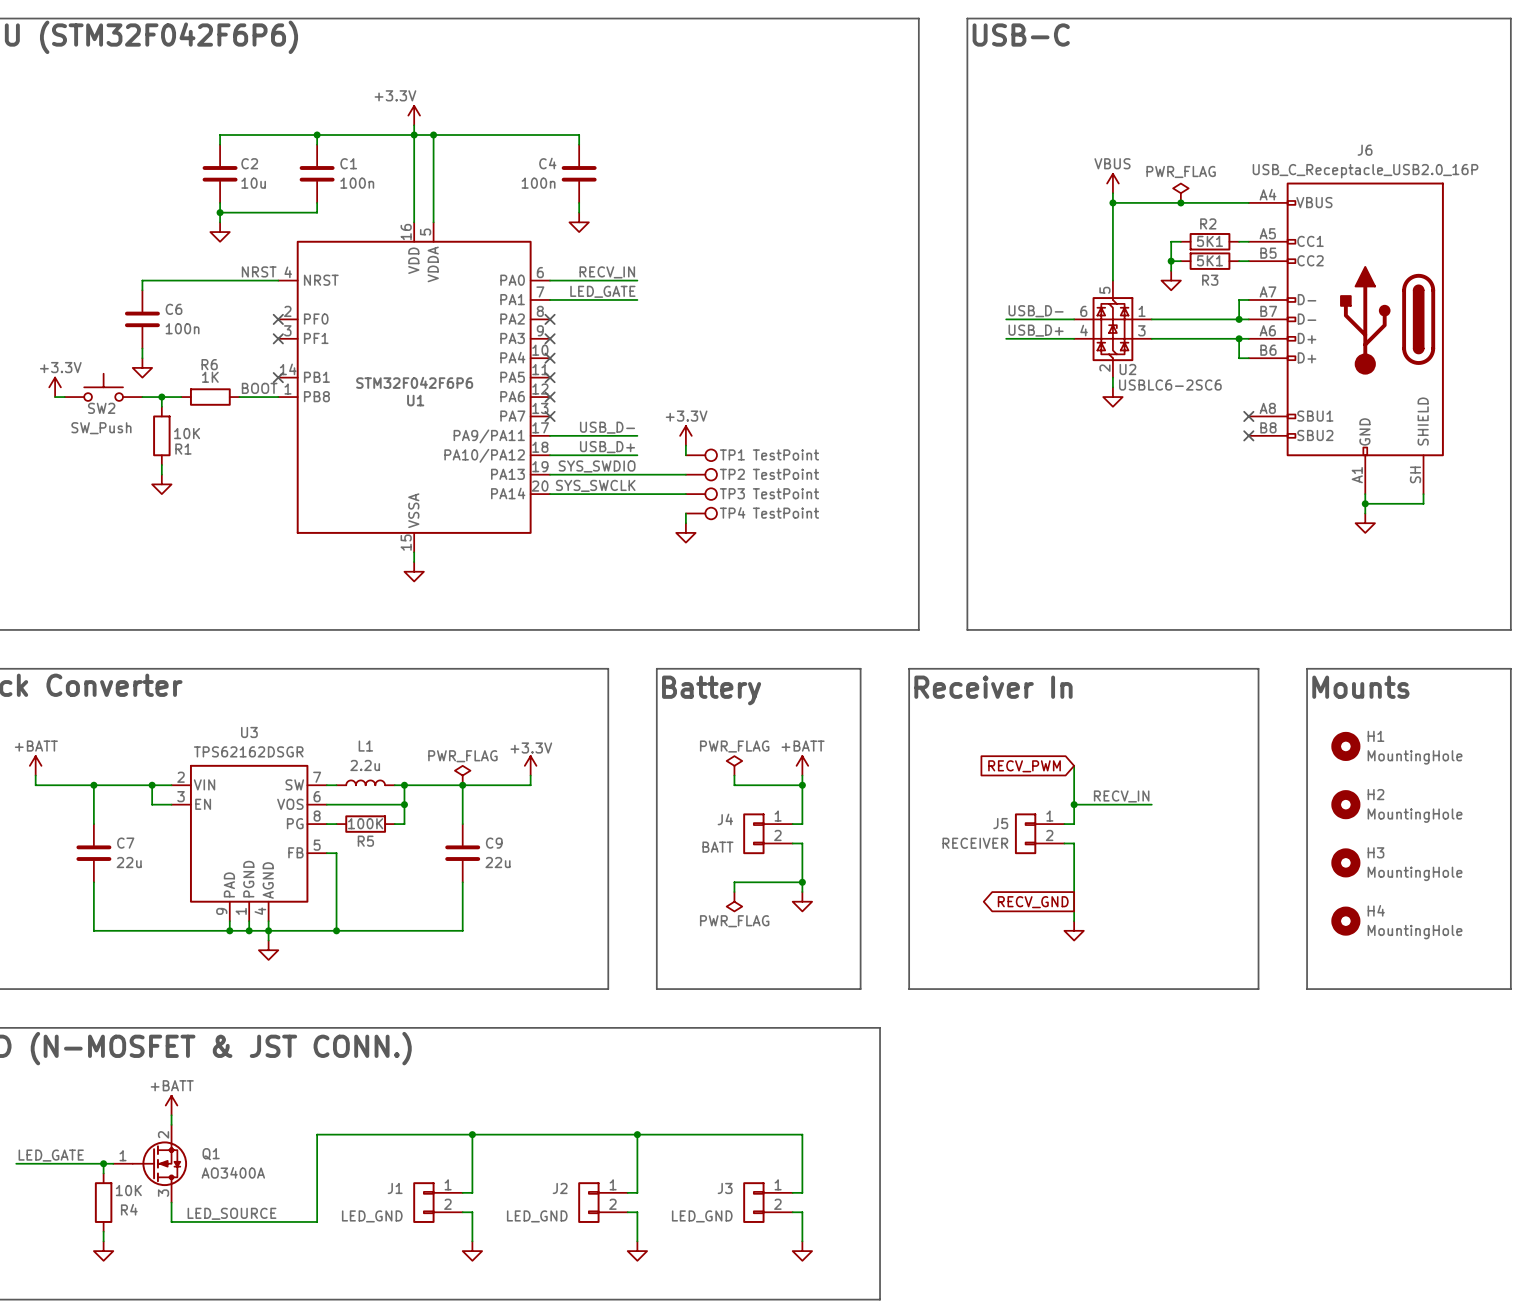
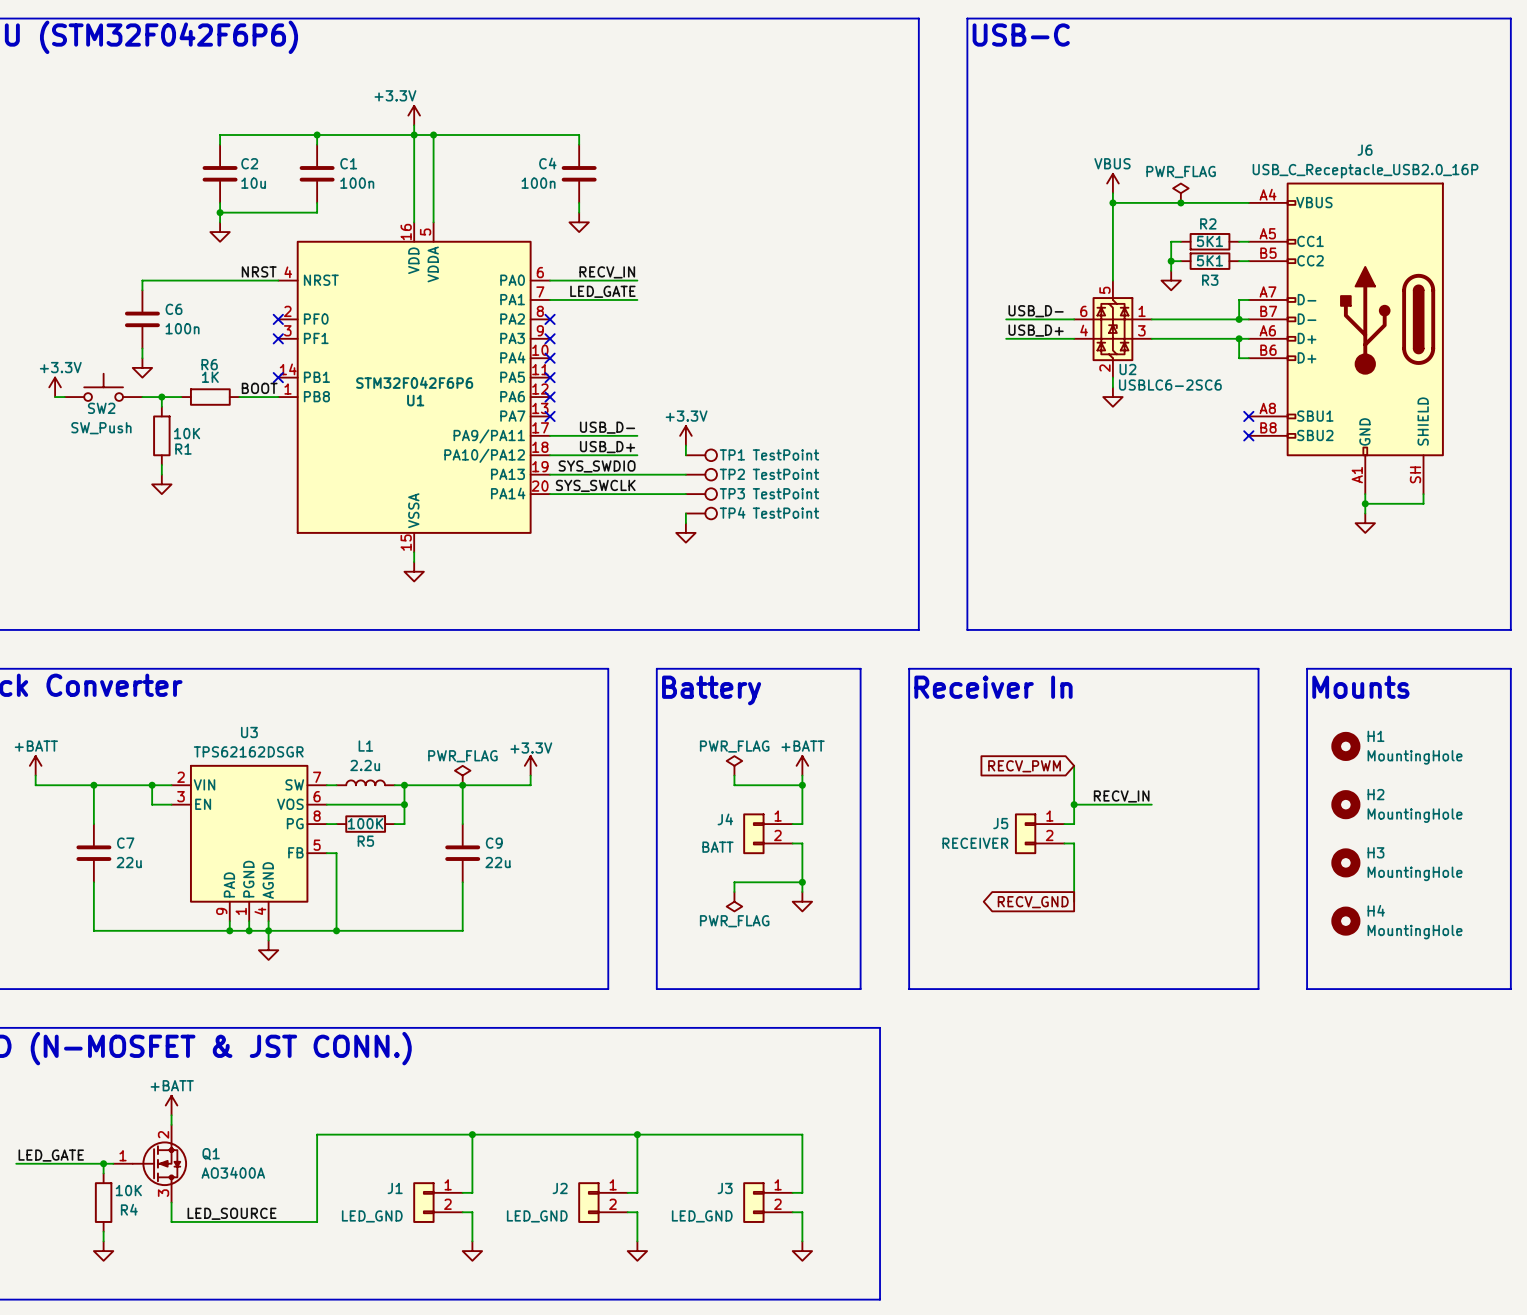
wire: (1074, 901) (1074, 921) -> none
power symbol: (1074, 930) -> none

